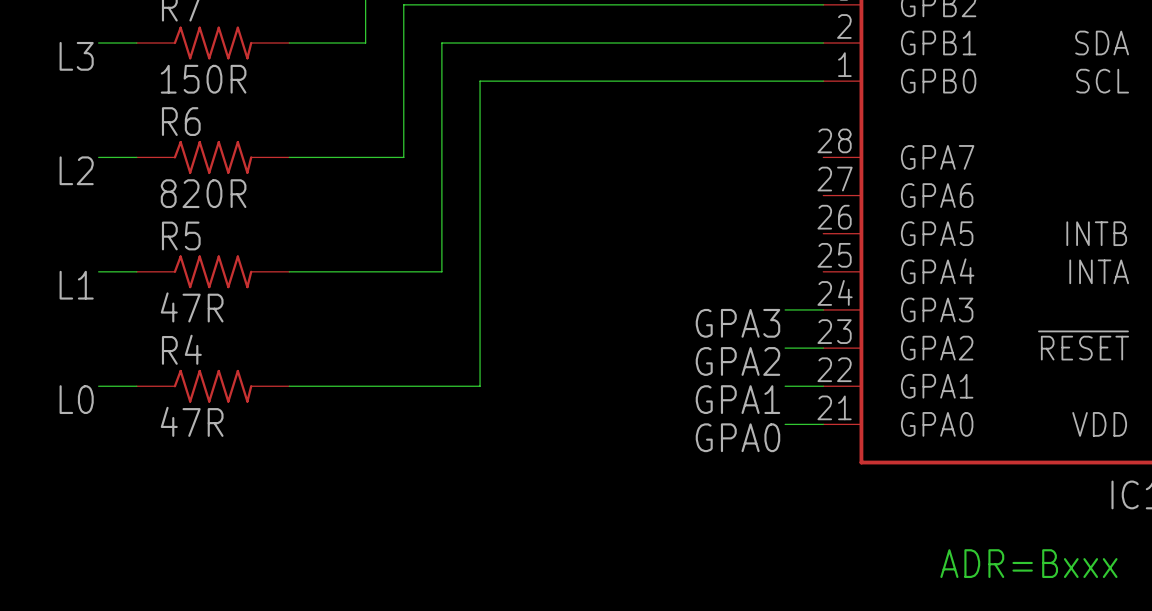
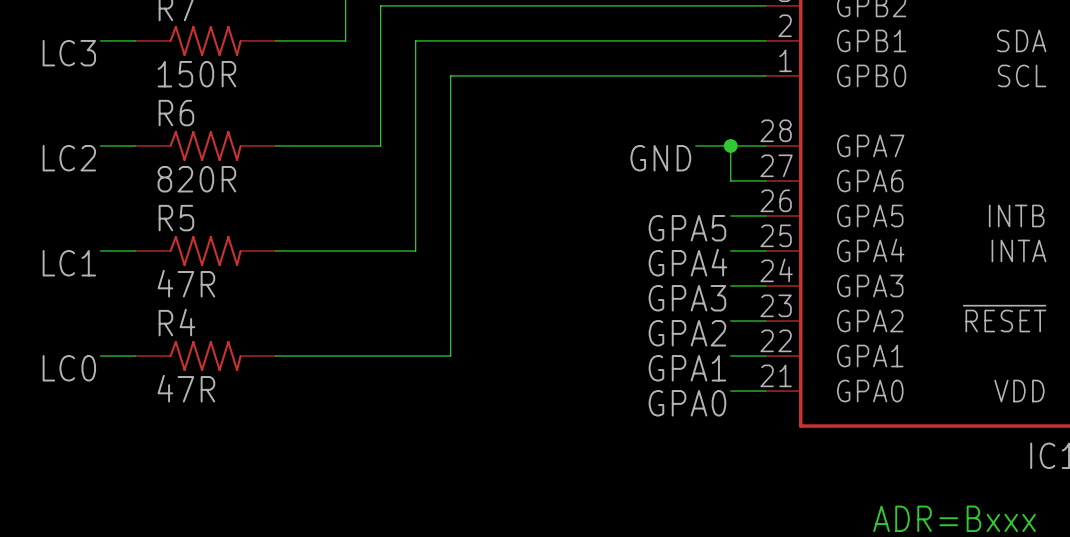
label: L3 (76, 56) -> LC3 (69, 53)
wire: none -> (695, 145) (765, 145)
wire: none -> (730, 145) (730, 180) (765, 180)
junction: none -> (730, 145)
label: L2 (76, 170) -> LC2 (69, 158)
label: none -> GND (660, 158)
wire: none -> (730, 215) (765, 215)
label: none -> GPA5 (687, 228)
wire: none -> (730, 250) (765, 250)
label: none -> GPA4 (687, 262)
label: L1 (76, 285) -> LC1 (69, 263)
label: L0 (76, 399) -> LC0 (69, 368)

